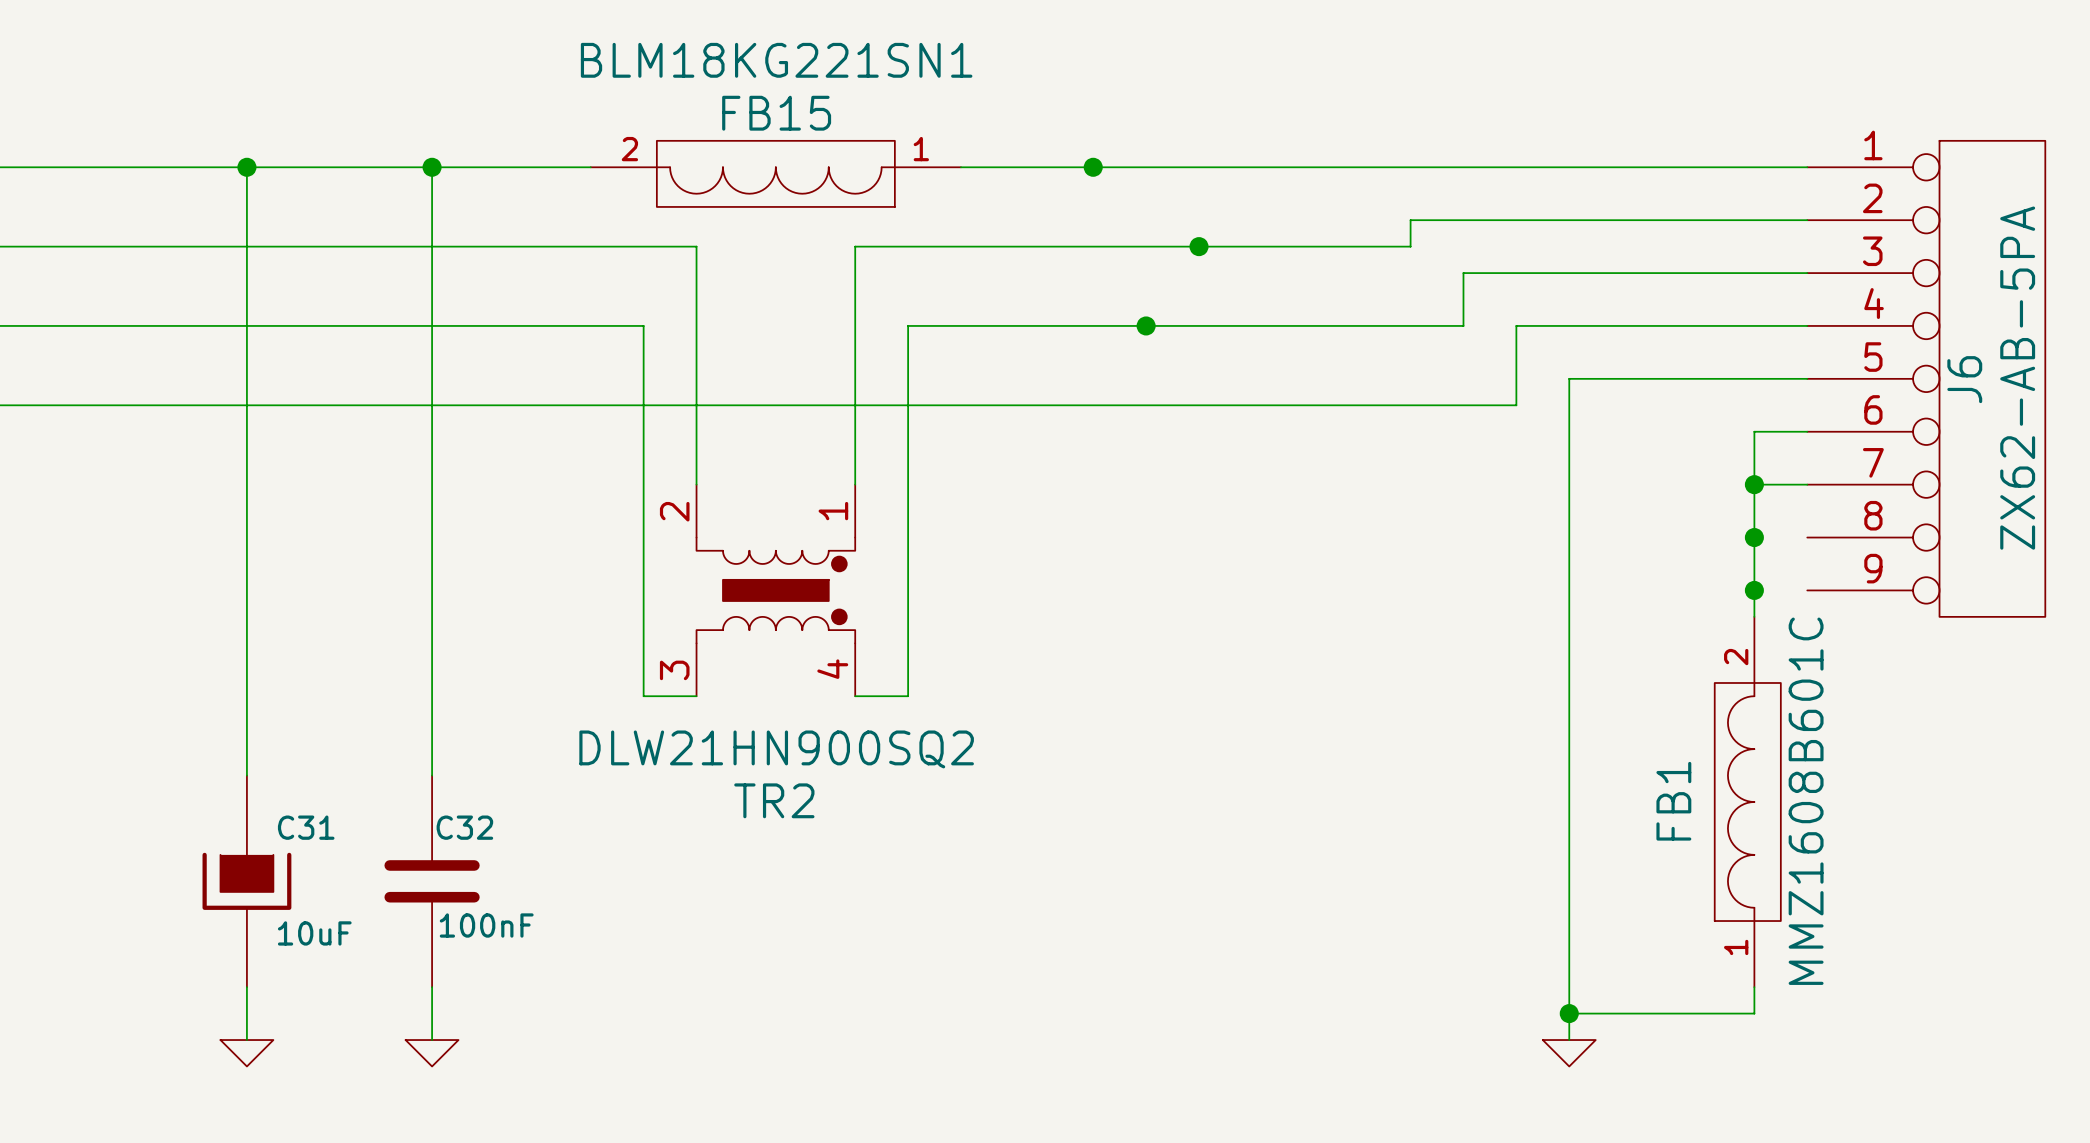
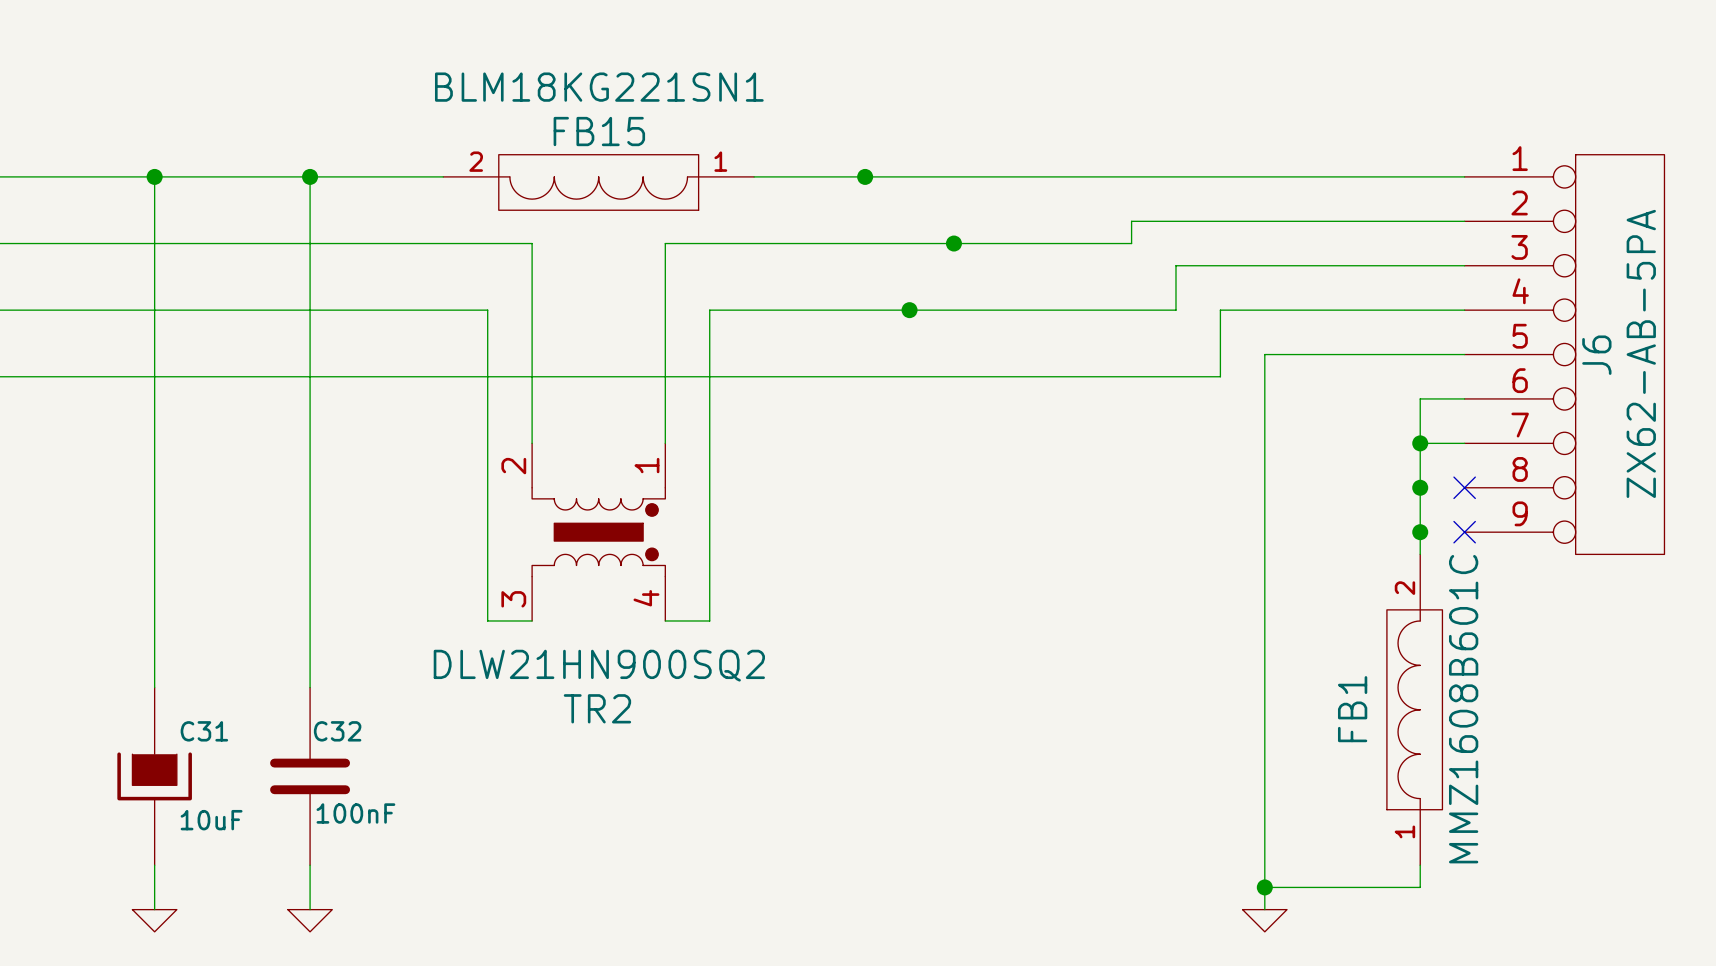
no-connect mark: none -> (1464, 487)
no-connect mark: none -> (1464, 532)

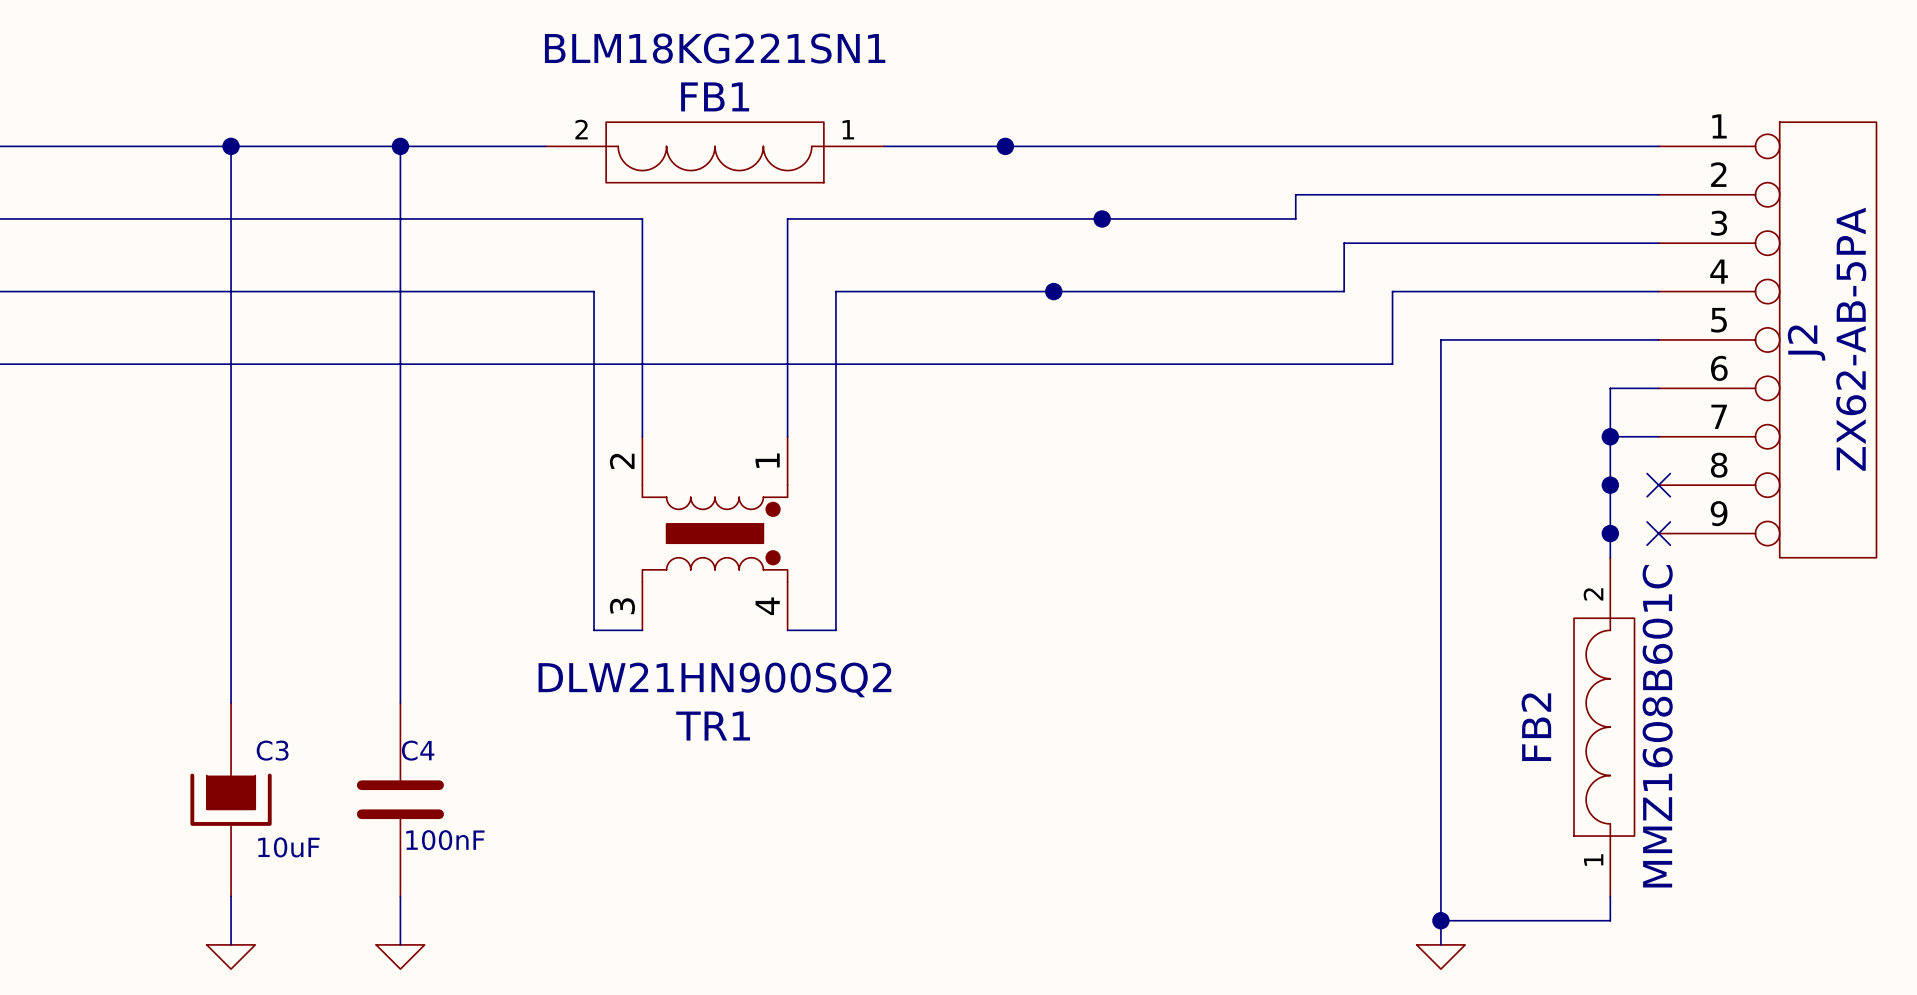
FB15 name: FB15 (599, 131) -> FB1 (715, 96)
J6 name: J6 (1596, 355) -> J2 (1806, 342)
TR2 name: TR2 (597, 708) -> TR1 (713, 726)
FB1 name: FB1 (1352, 709) -> FB2 (1536, 727)
C31 name: C31 (204, 731) -> C3 (272, 750)
C32 name: C32 (337, 731) -> C4 (418, 750)

